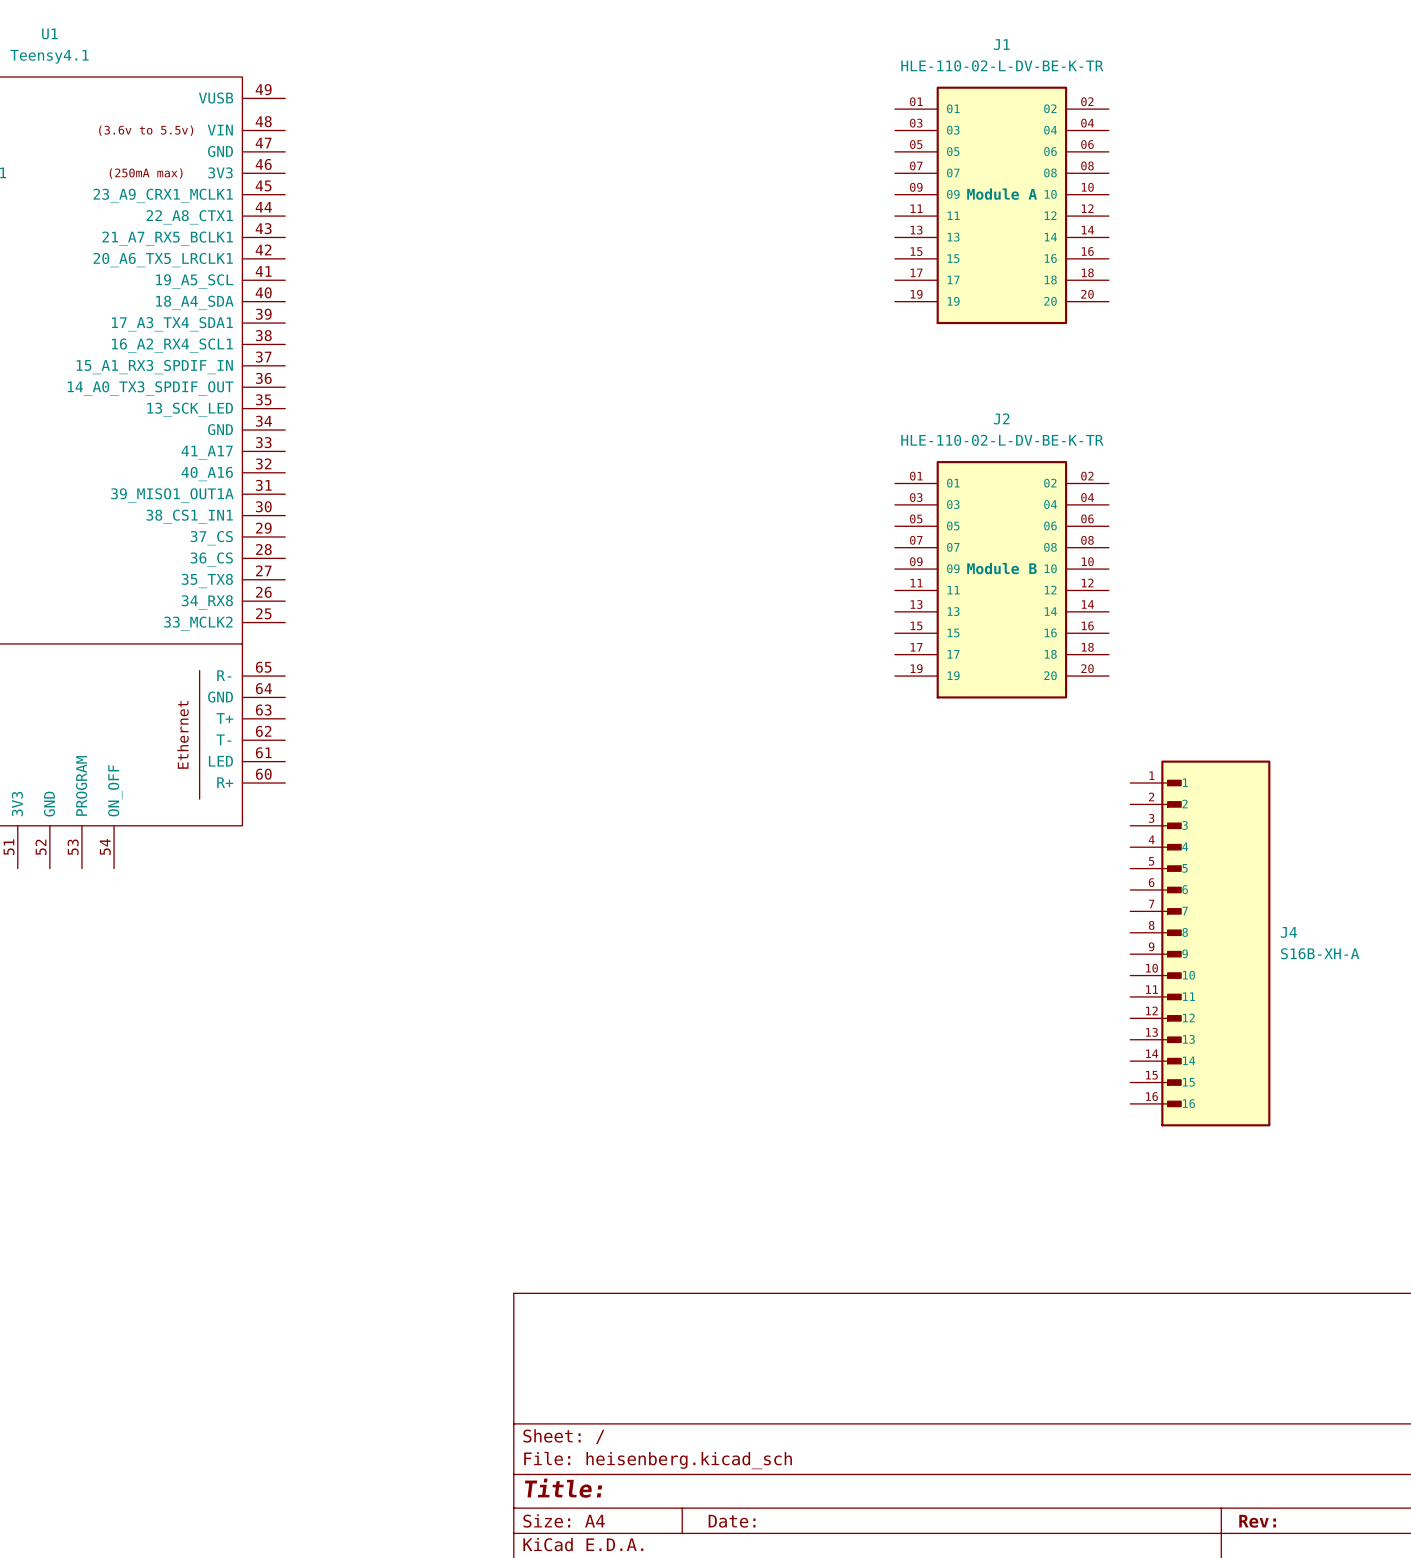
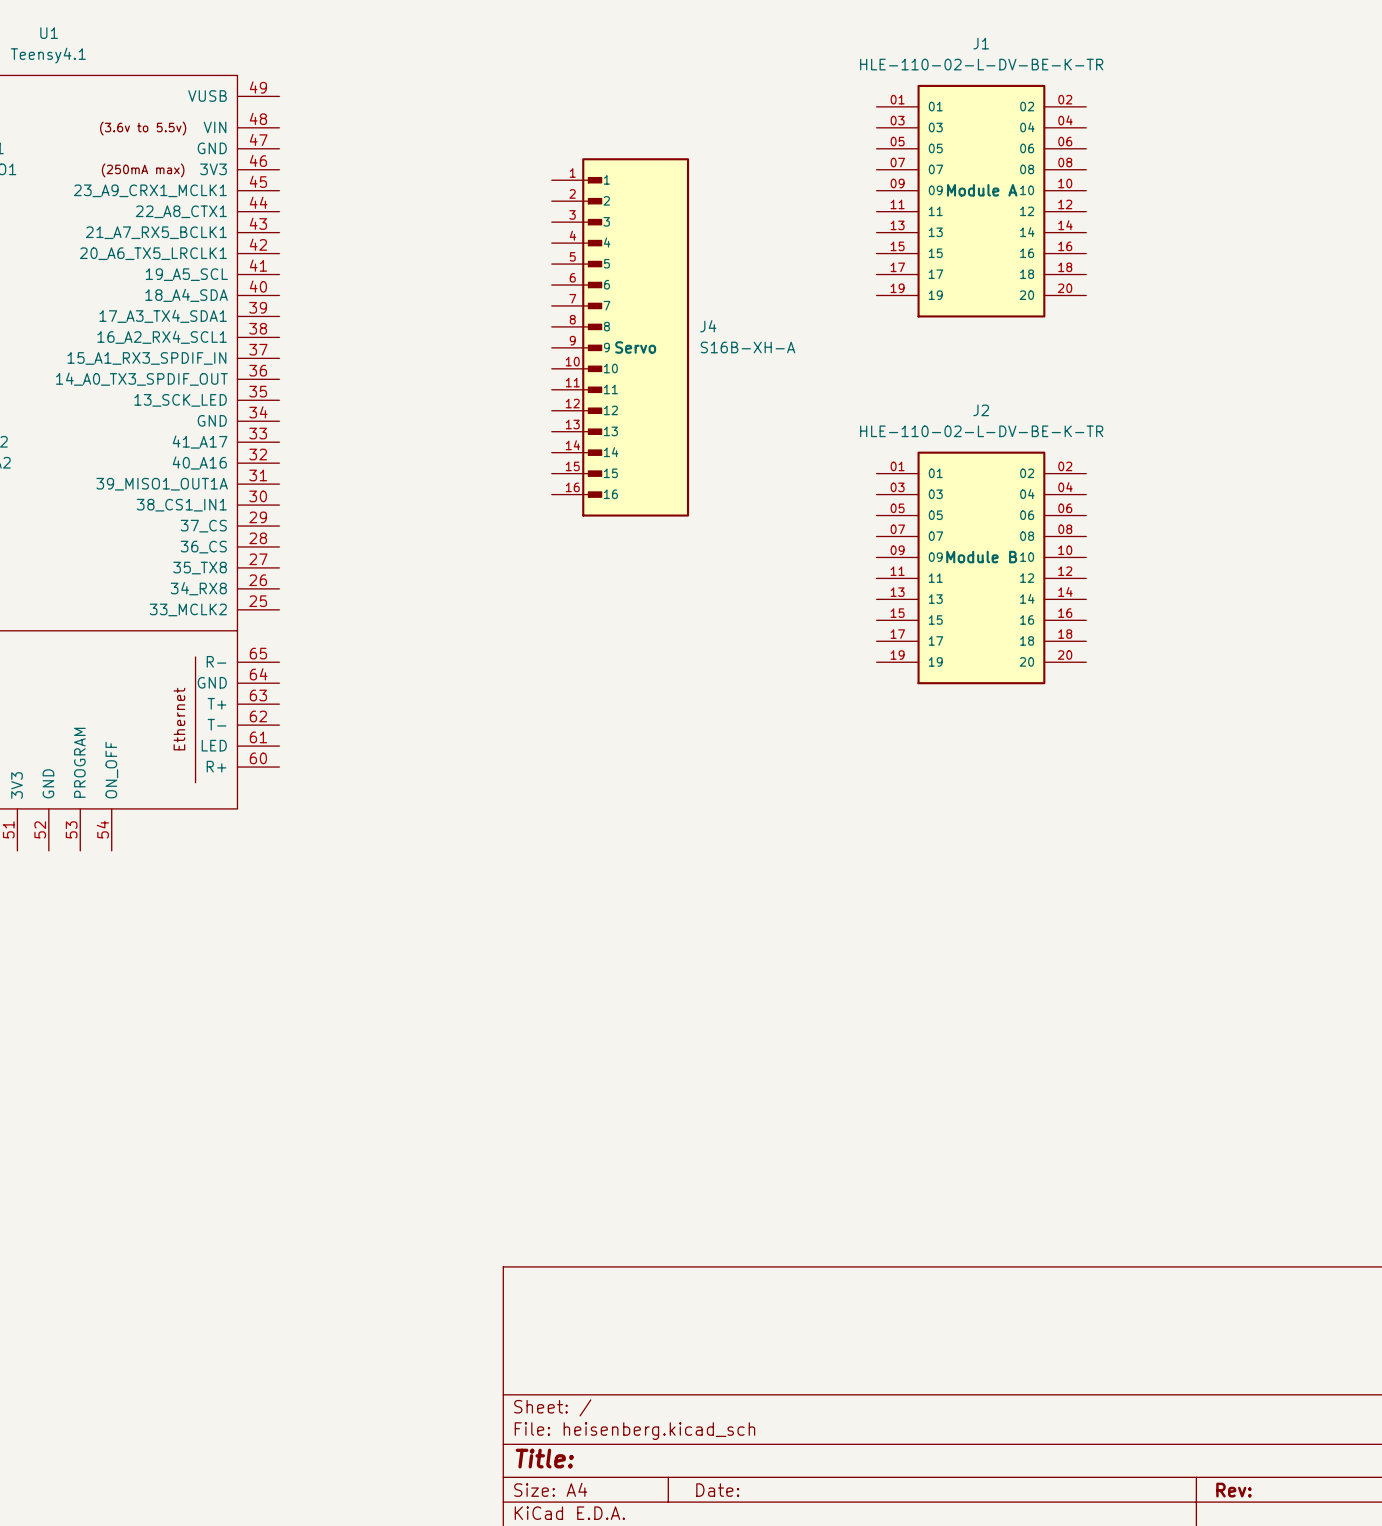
J4 text: none -> Servo (635, 347)
J4 position: (1200, 943) -> (620, 337)

